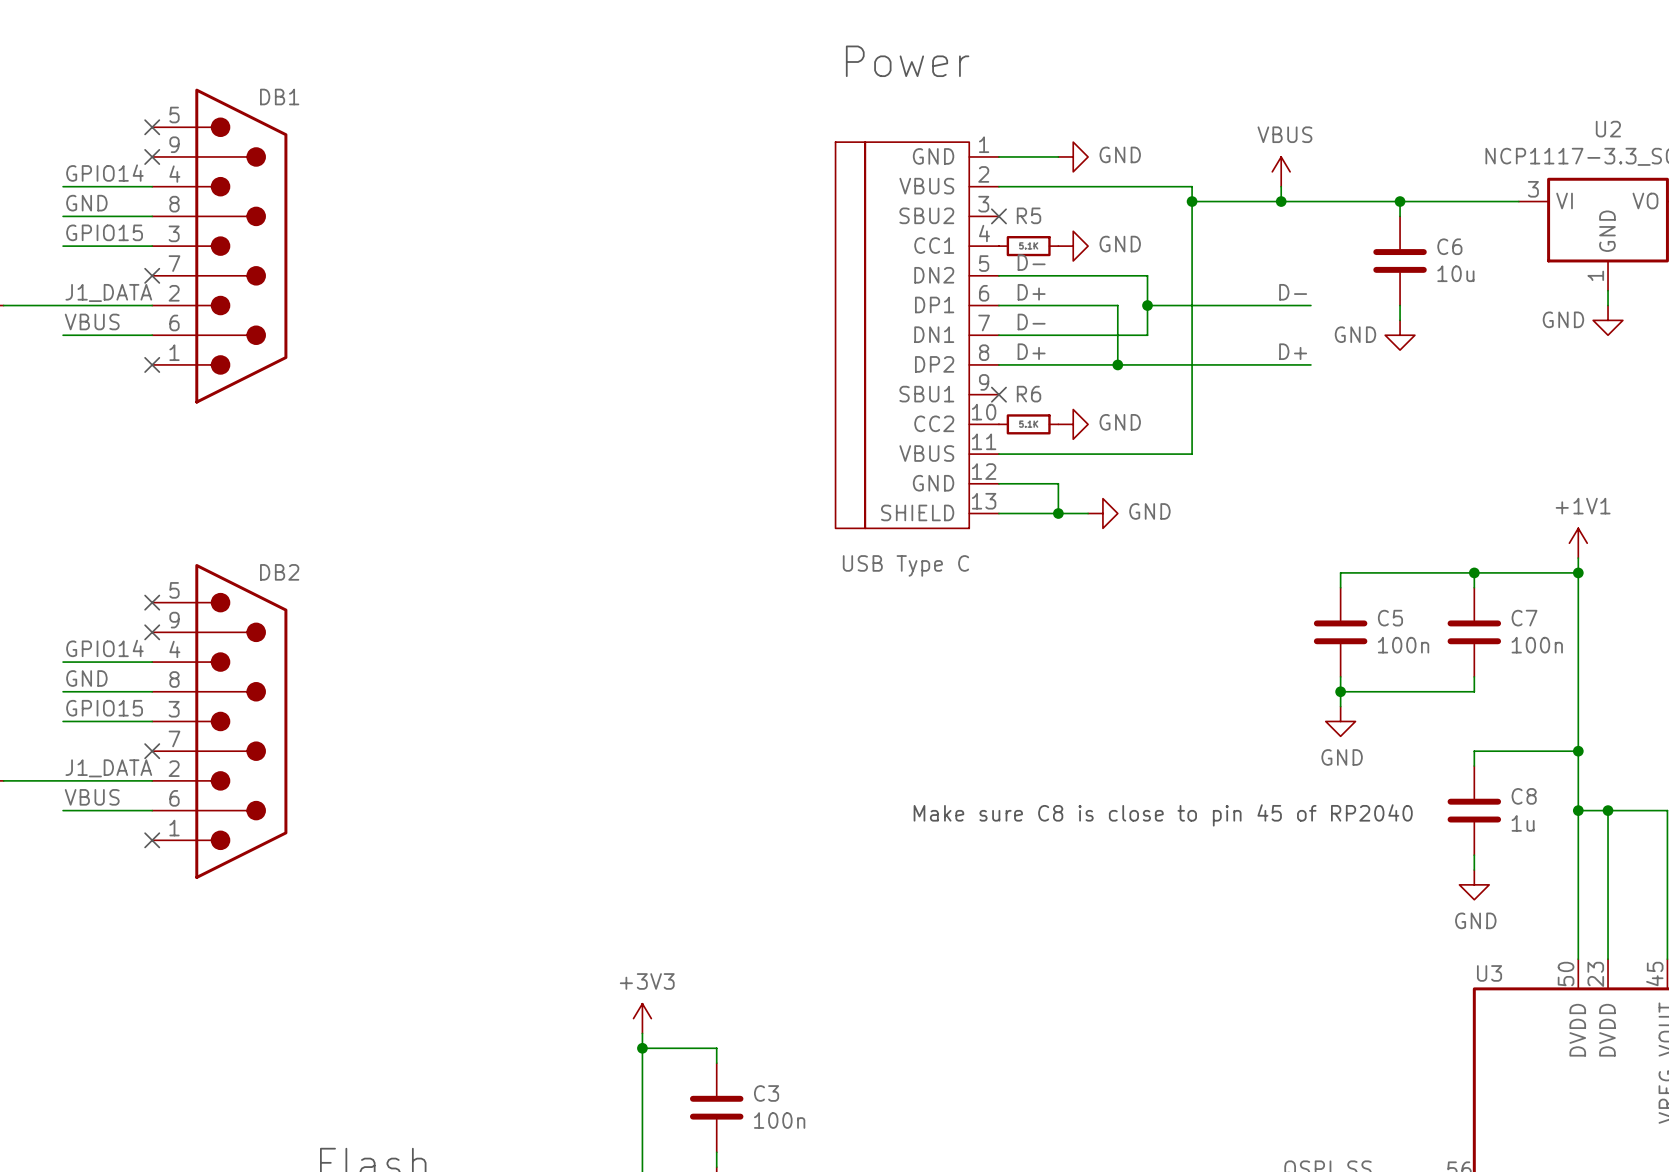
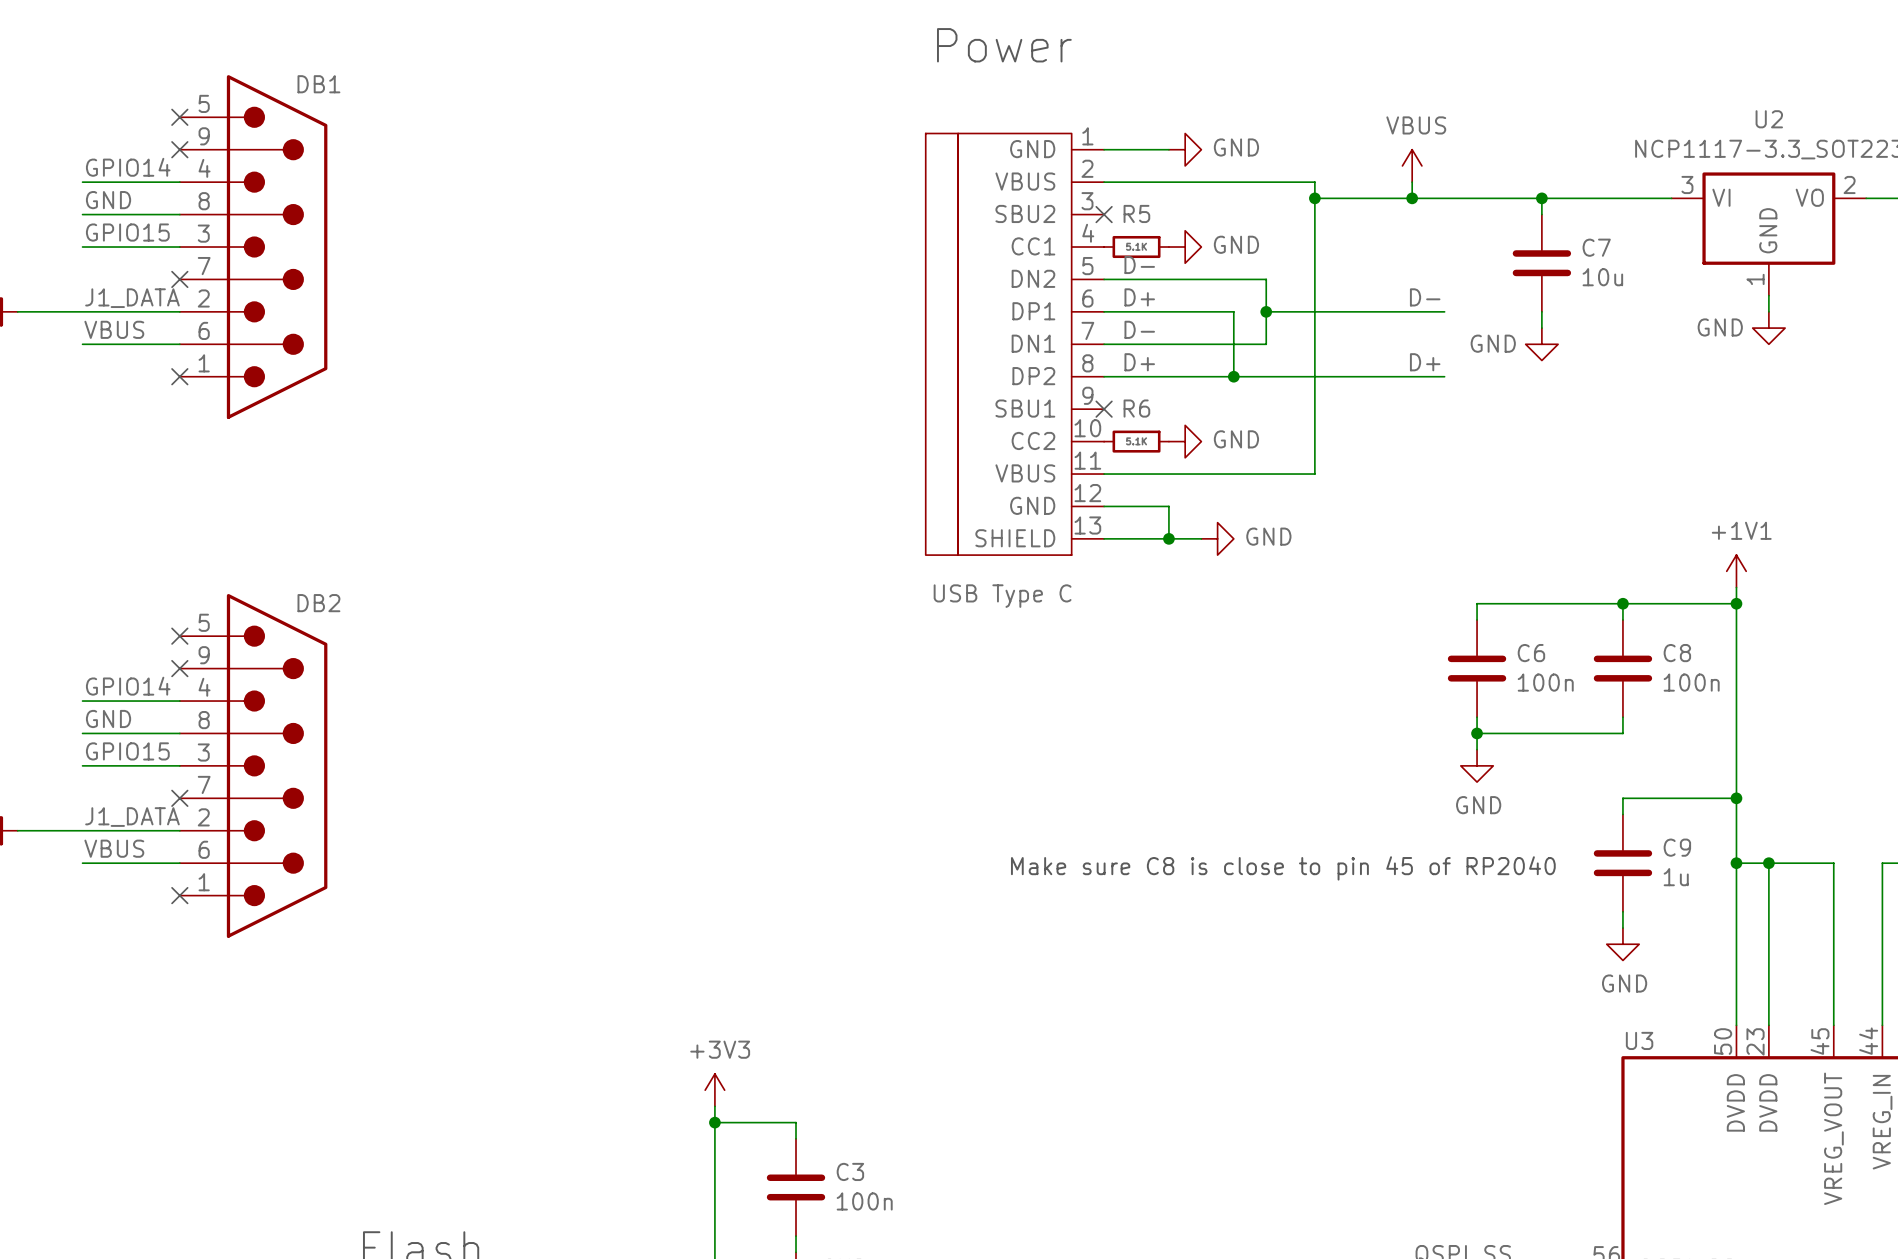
C6 name: C6 (1449, 246) -> C7 (1596, 247)
C5 name: C5 (1390, 618) -> C6 (1531, 653)
C7 name: C7 (1524, 618) -> C8 (1677, 653)
C8 name: C8 (1524, 796) -> C9 (1677, 847)

